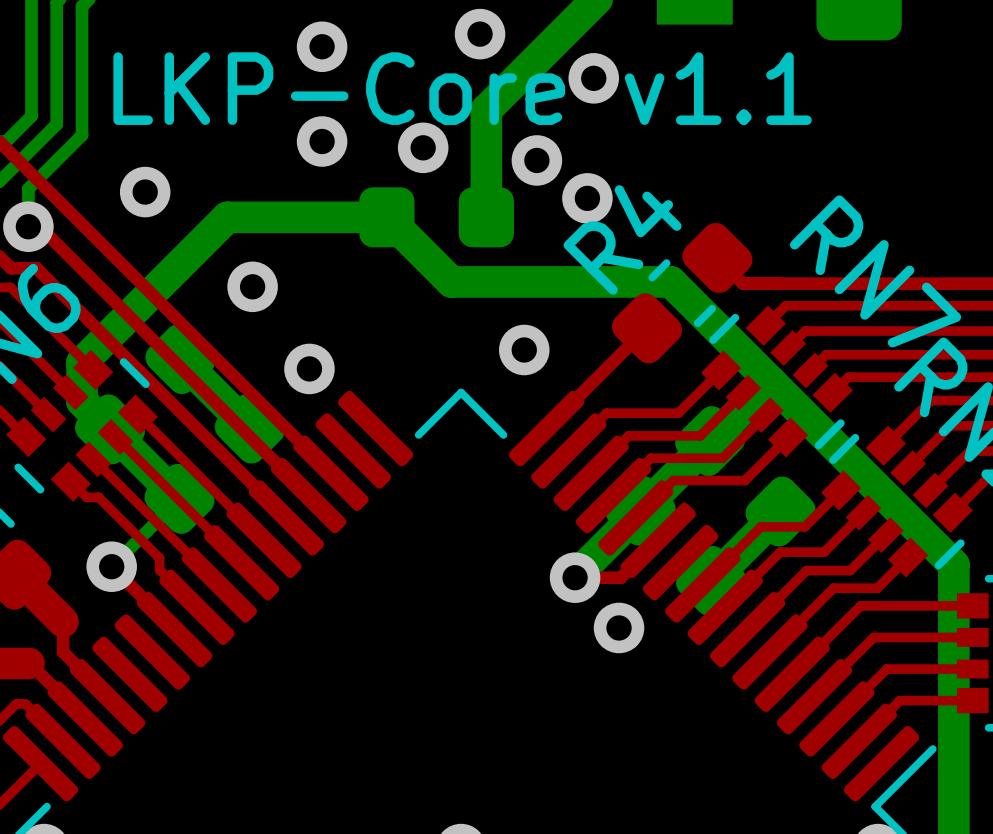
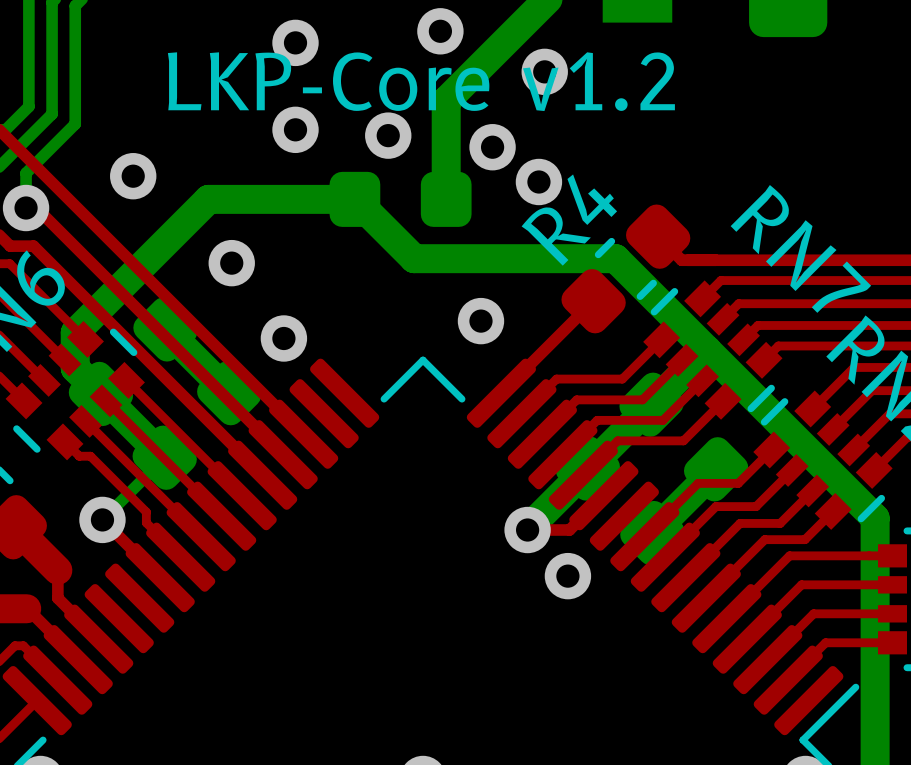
text: LKP-Core v1.1 (462, 88) -> LKP-Core v1.2 (421, 81)

